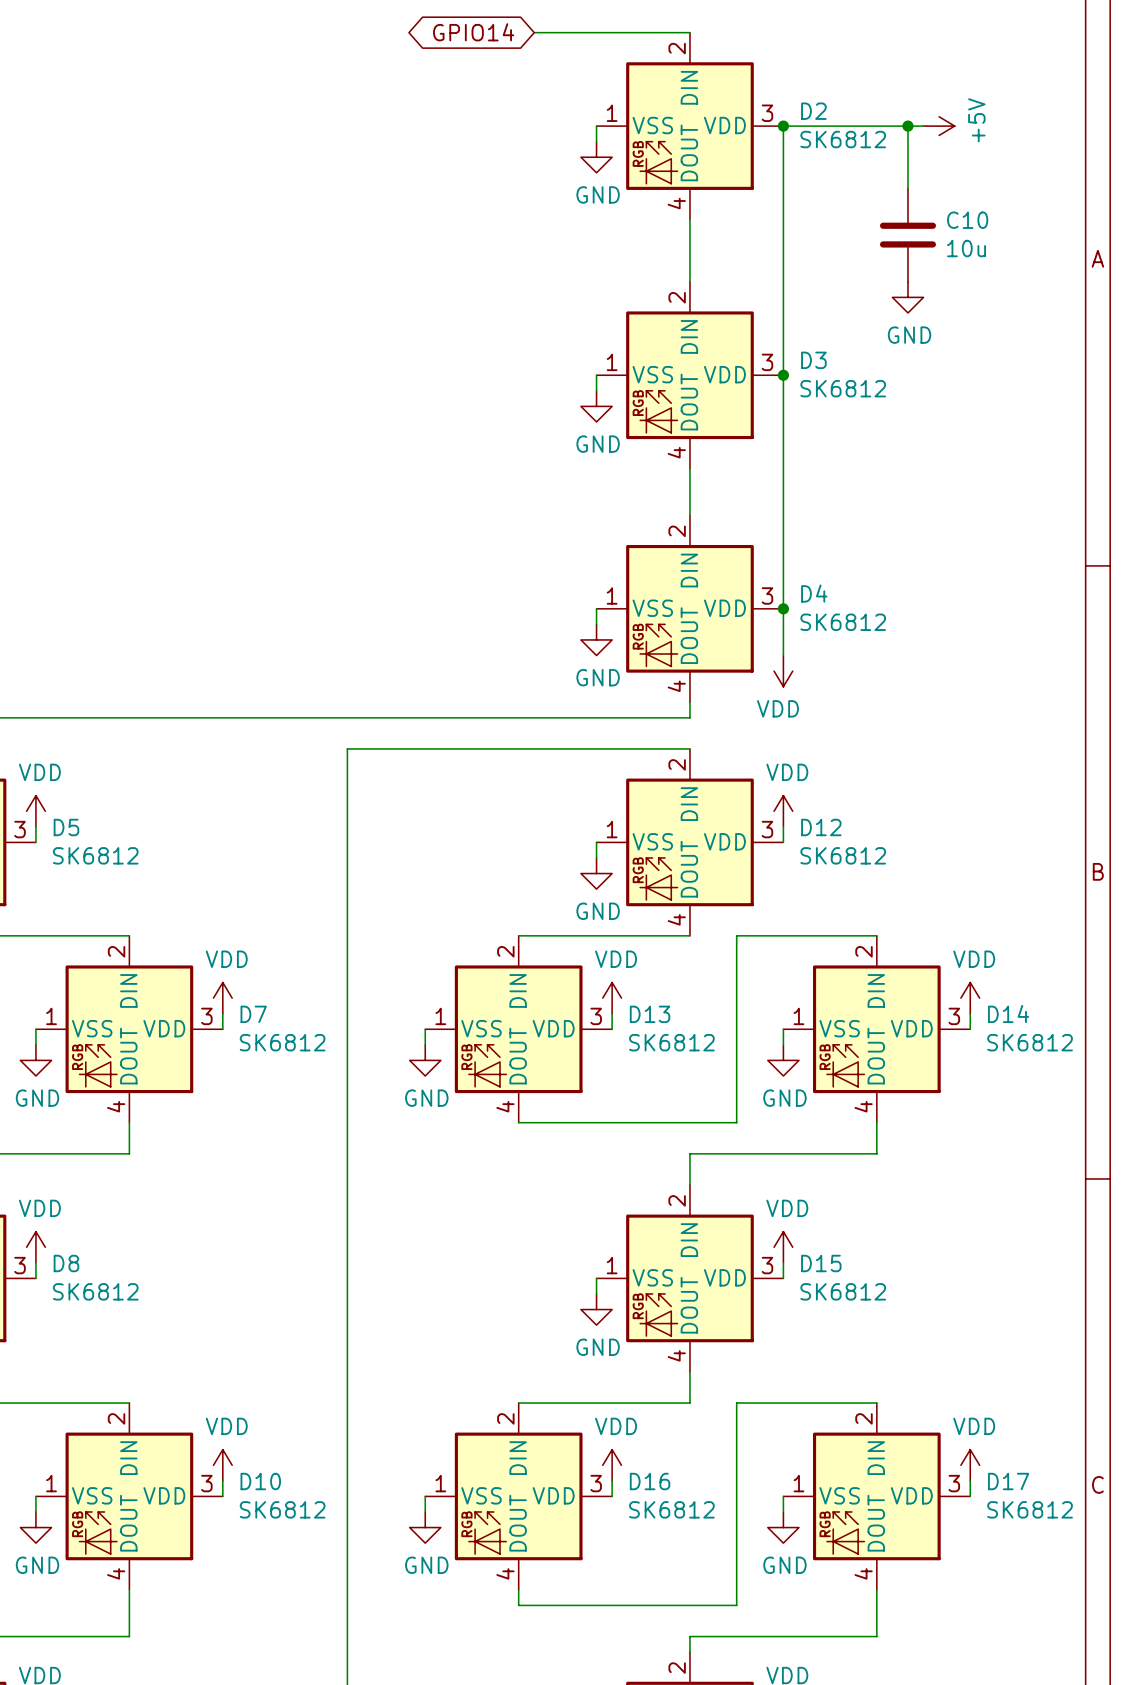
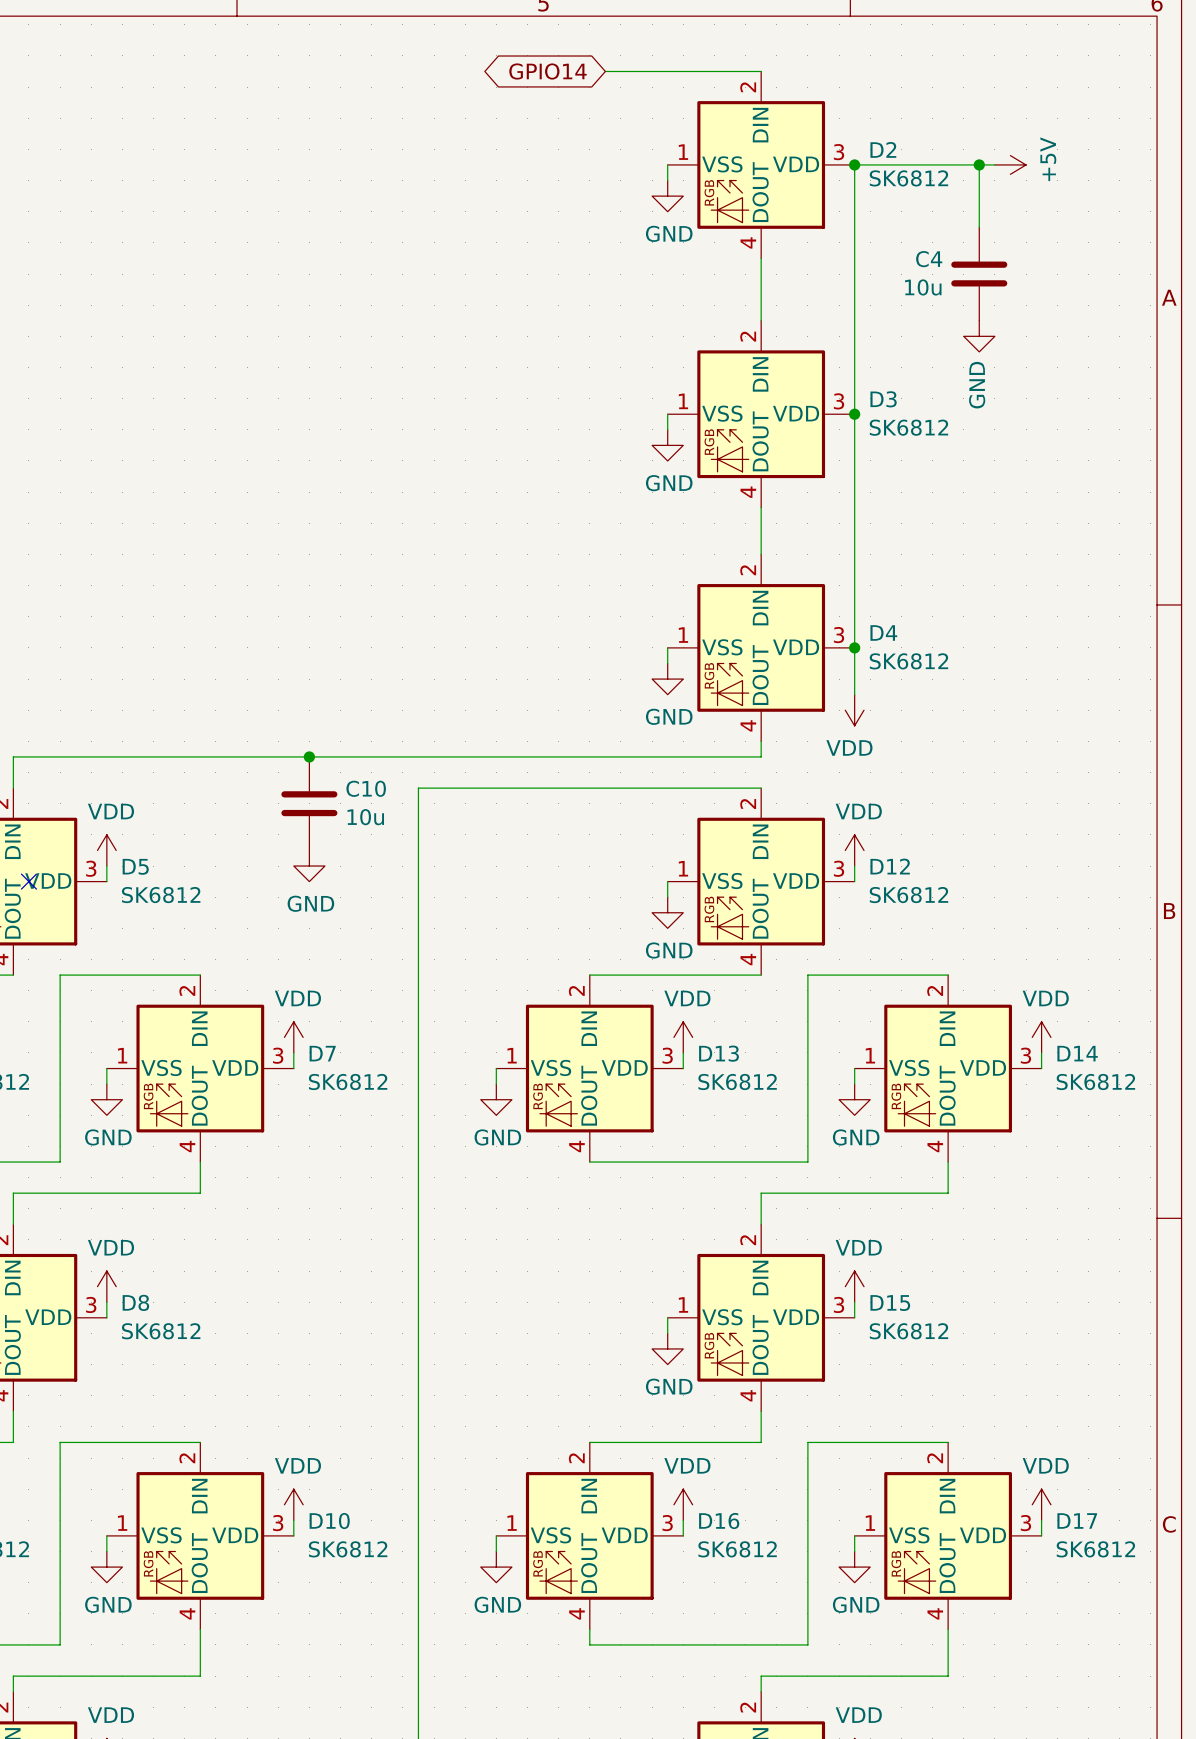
C10 name: C10 (967, 220) -> C4 (929, 259)
C10 value position: 10u (966, 248) -> 10u (923, 287)
power symbol text rotation: 0° (909, 335) -> 90° counterclockwise (977, 385)
junction: none -> (309, 756)
C10: none -> 10u (309, 803)
power symbol: none -> GND (309, 866)

